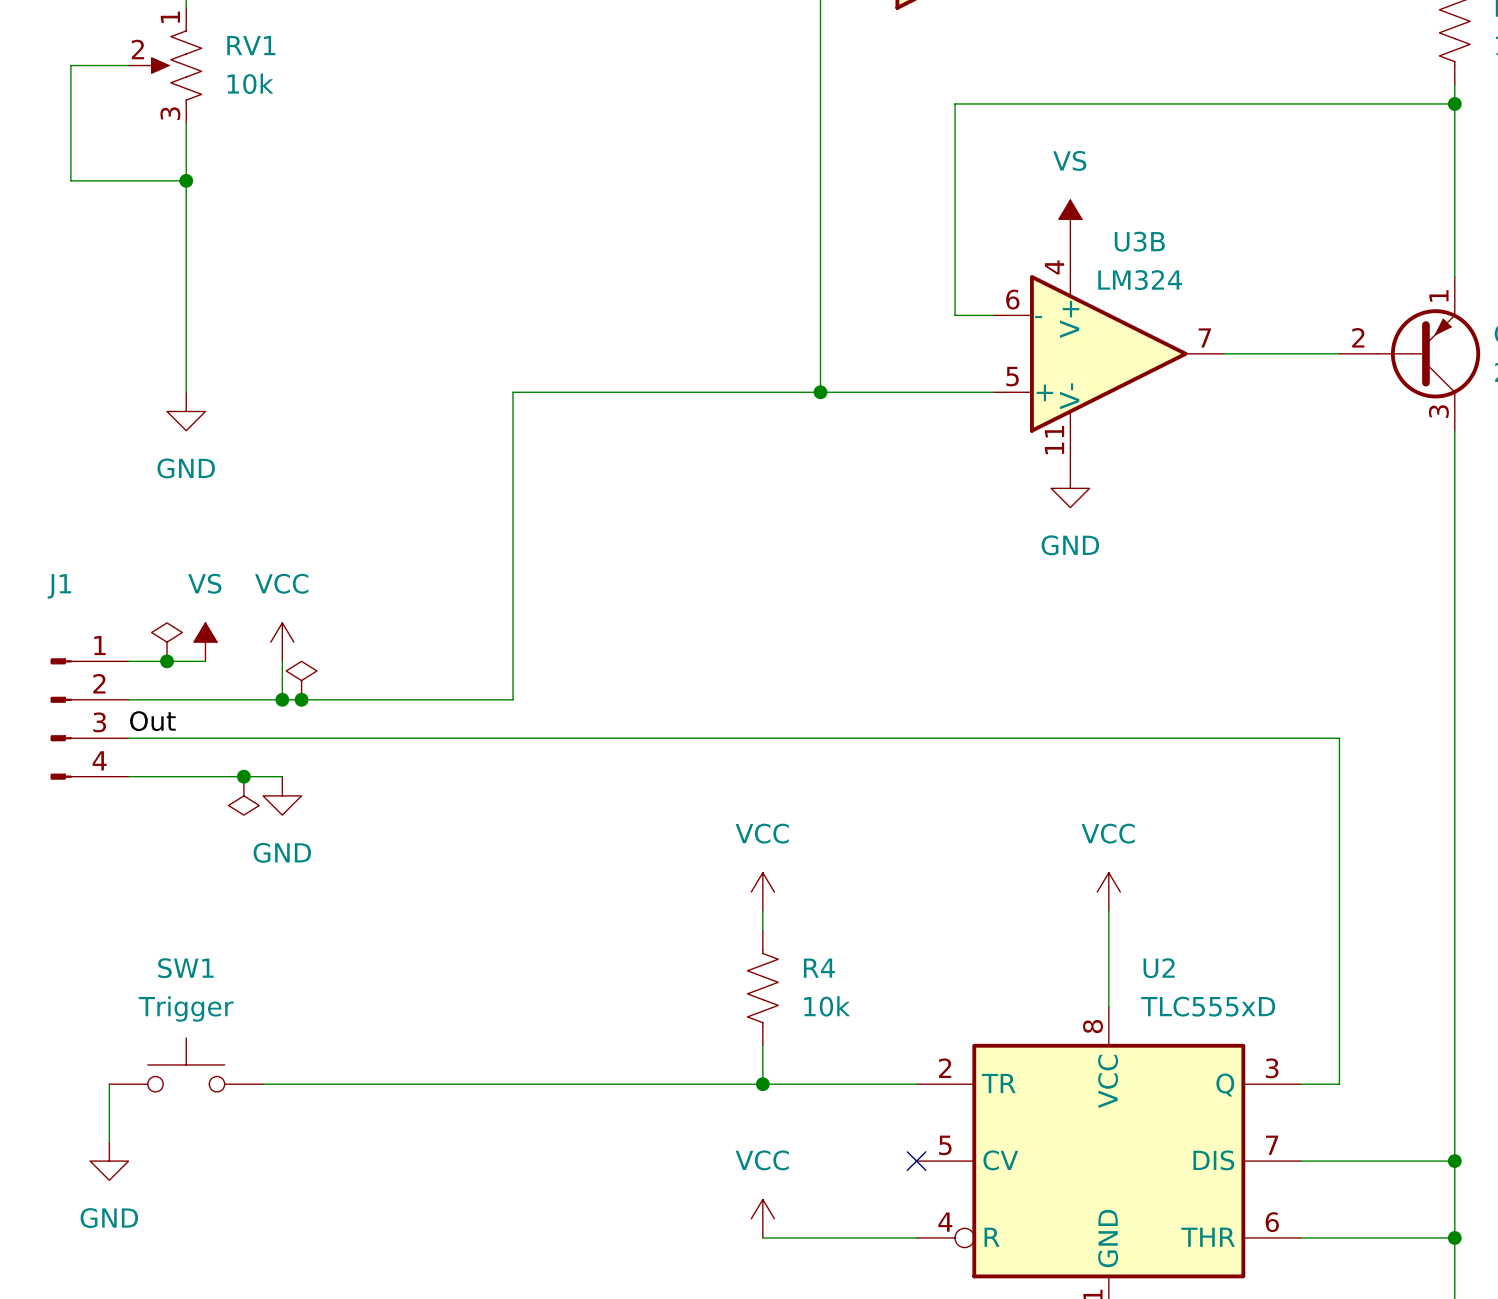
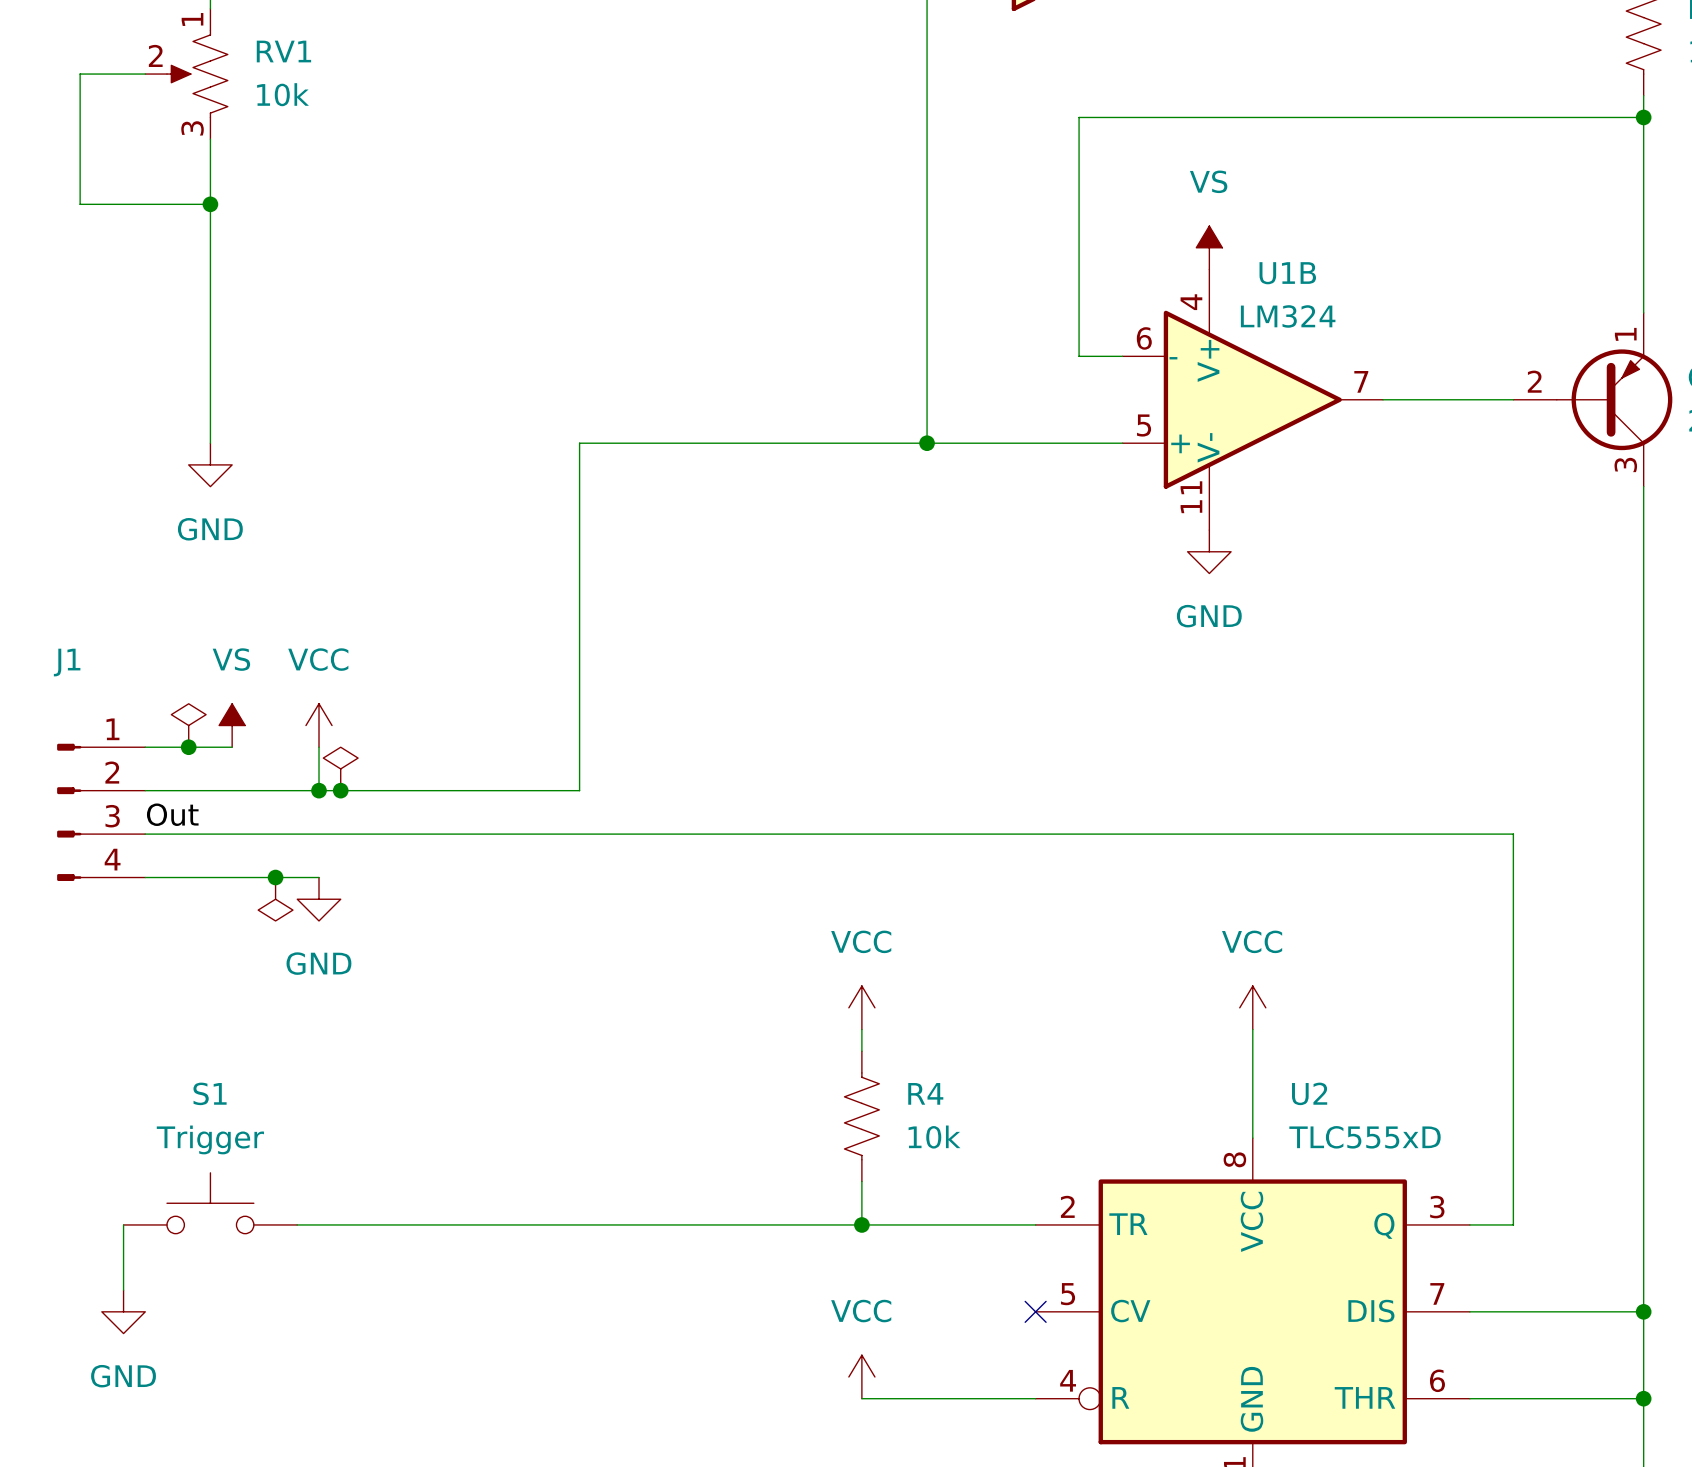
U3B name: U3B (1139, 241) -> U1B (1287, 273)
SW1 name: SW1 (185, 968) -> S1 (210, 1093)

